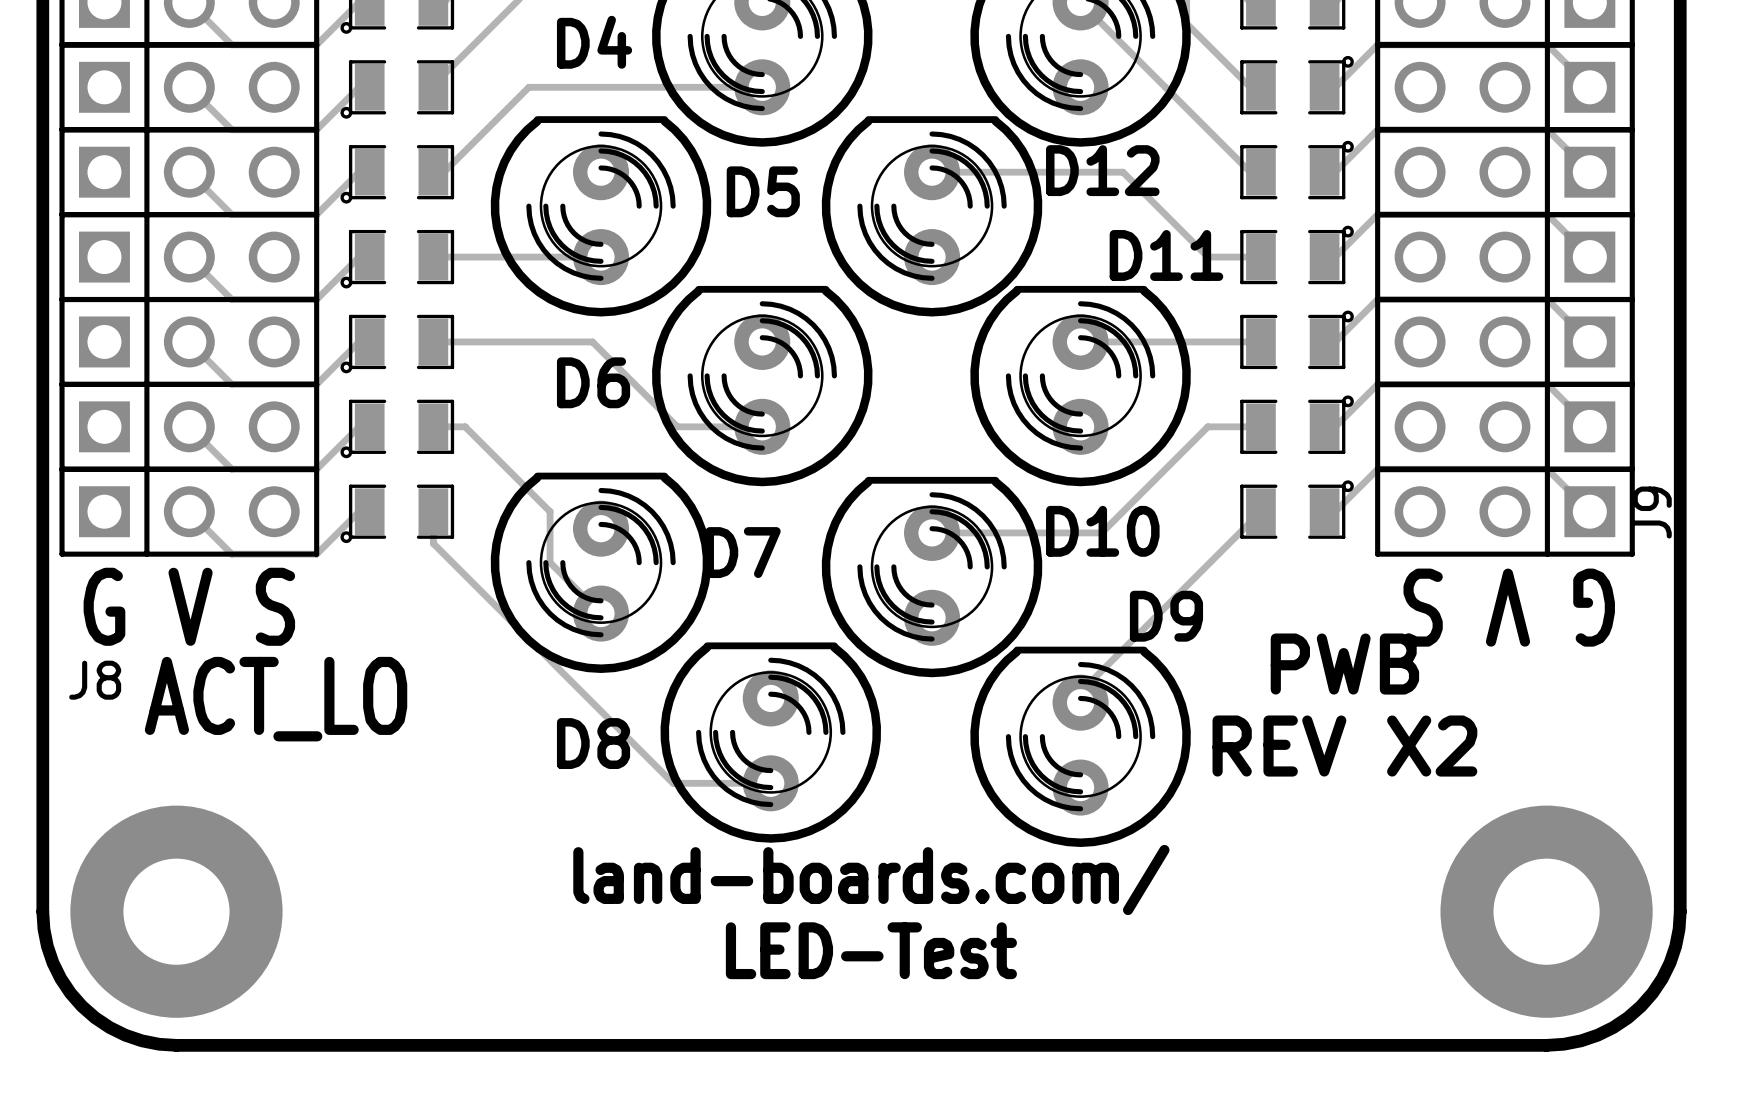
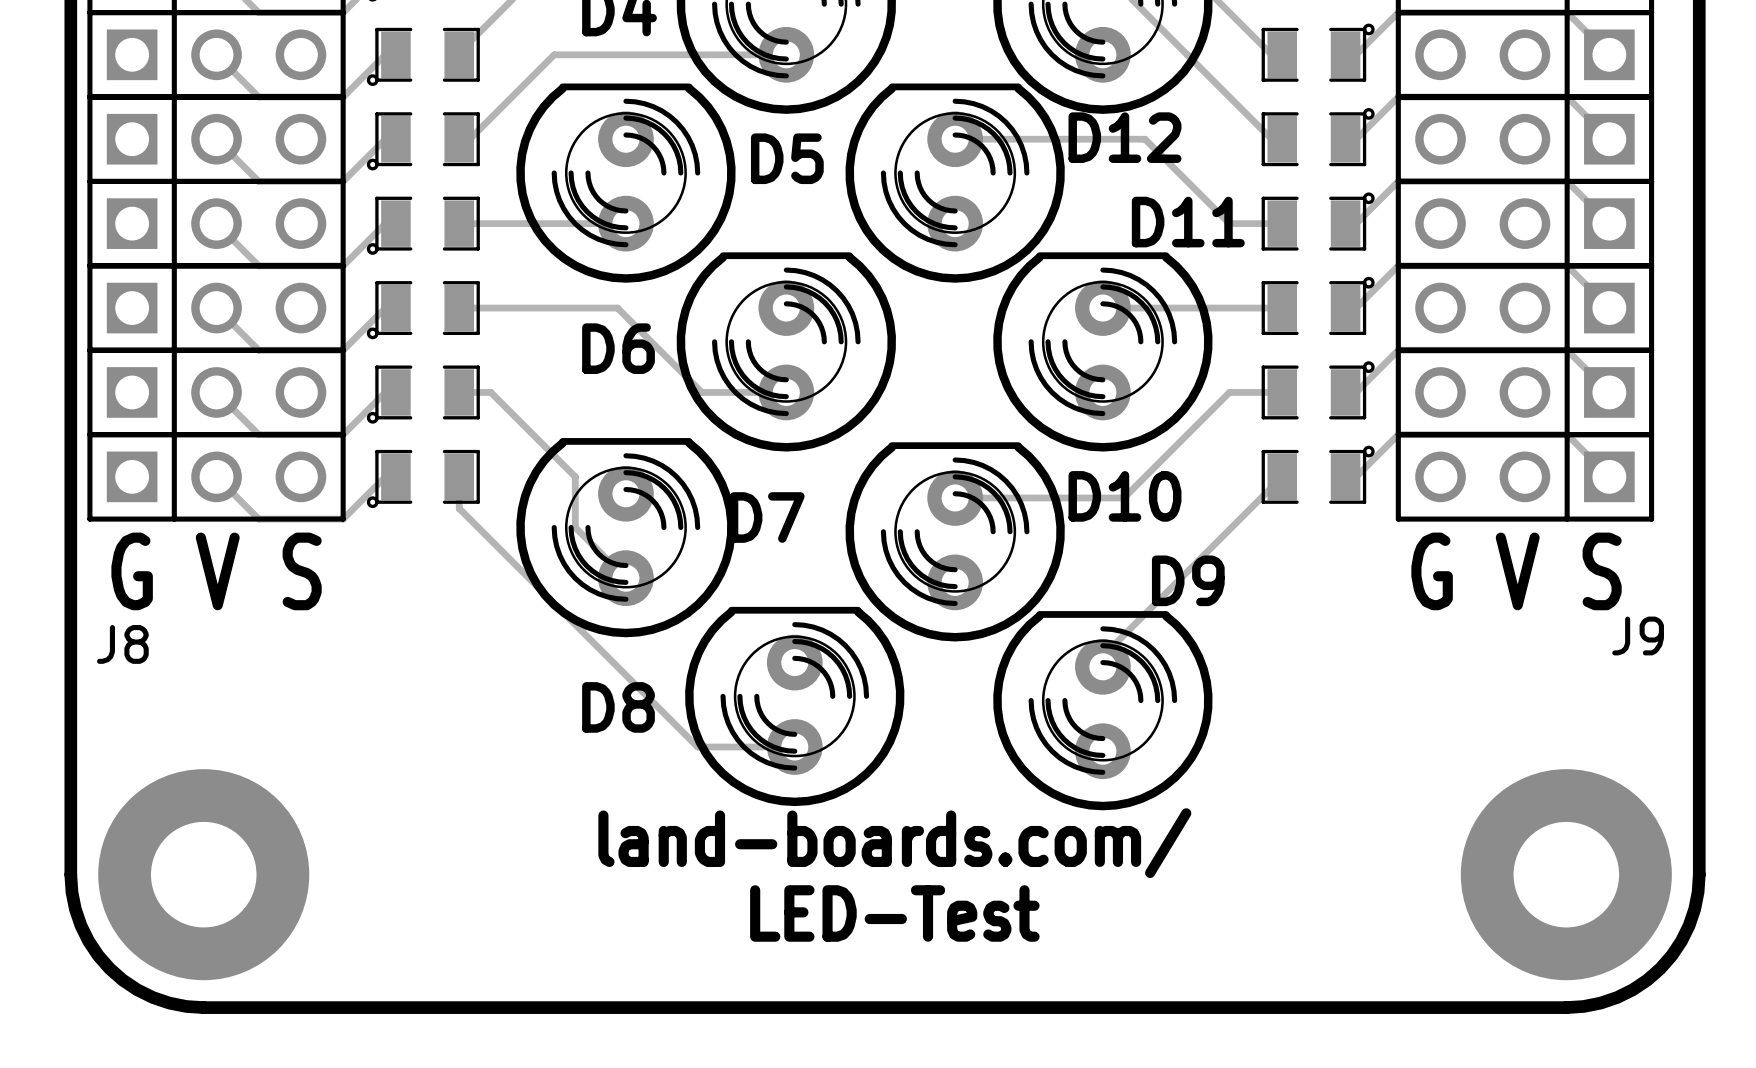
J9 name rotation: 0° (1652, 512) -> 90° clockwise (1638, 635)
J9 name position: J9 (1652, 512) -> J9 (1638, 635)
text rotation: 0° (1509, 607) -> 180° (1516, 571)
text: PWB (1344, 664) -> none
text: ACT_LO (276, 699) -> none
text: REV X2 (1344, 746) -> none

